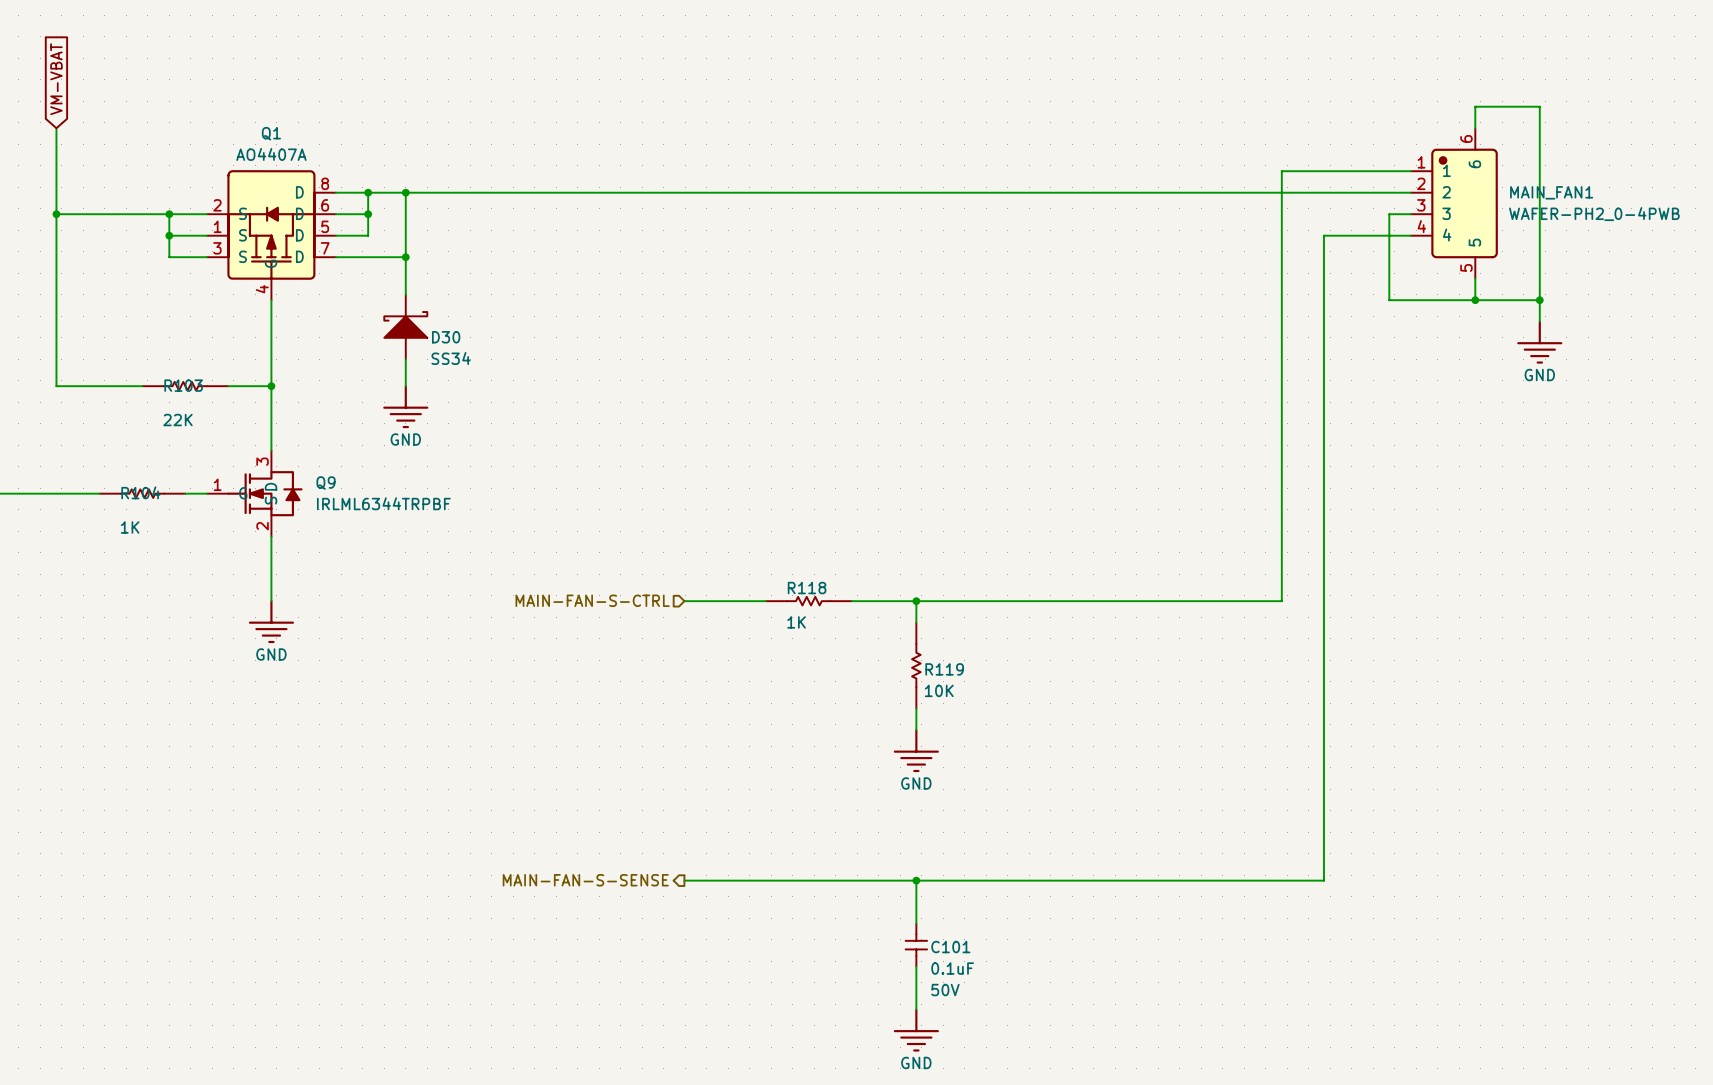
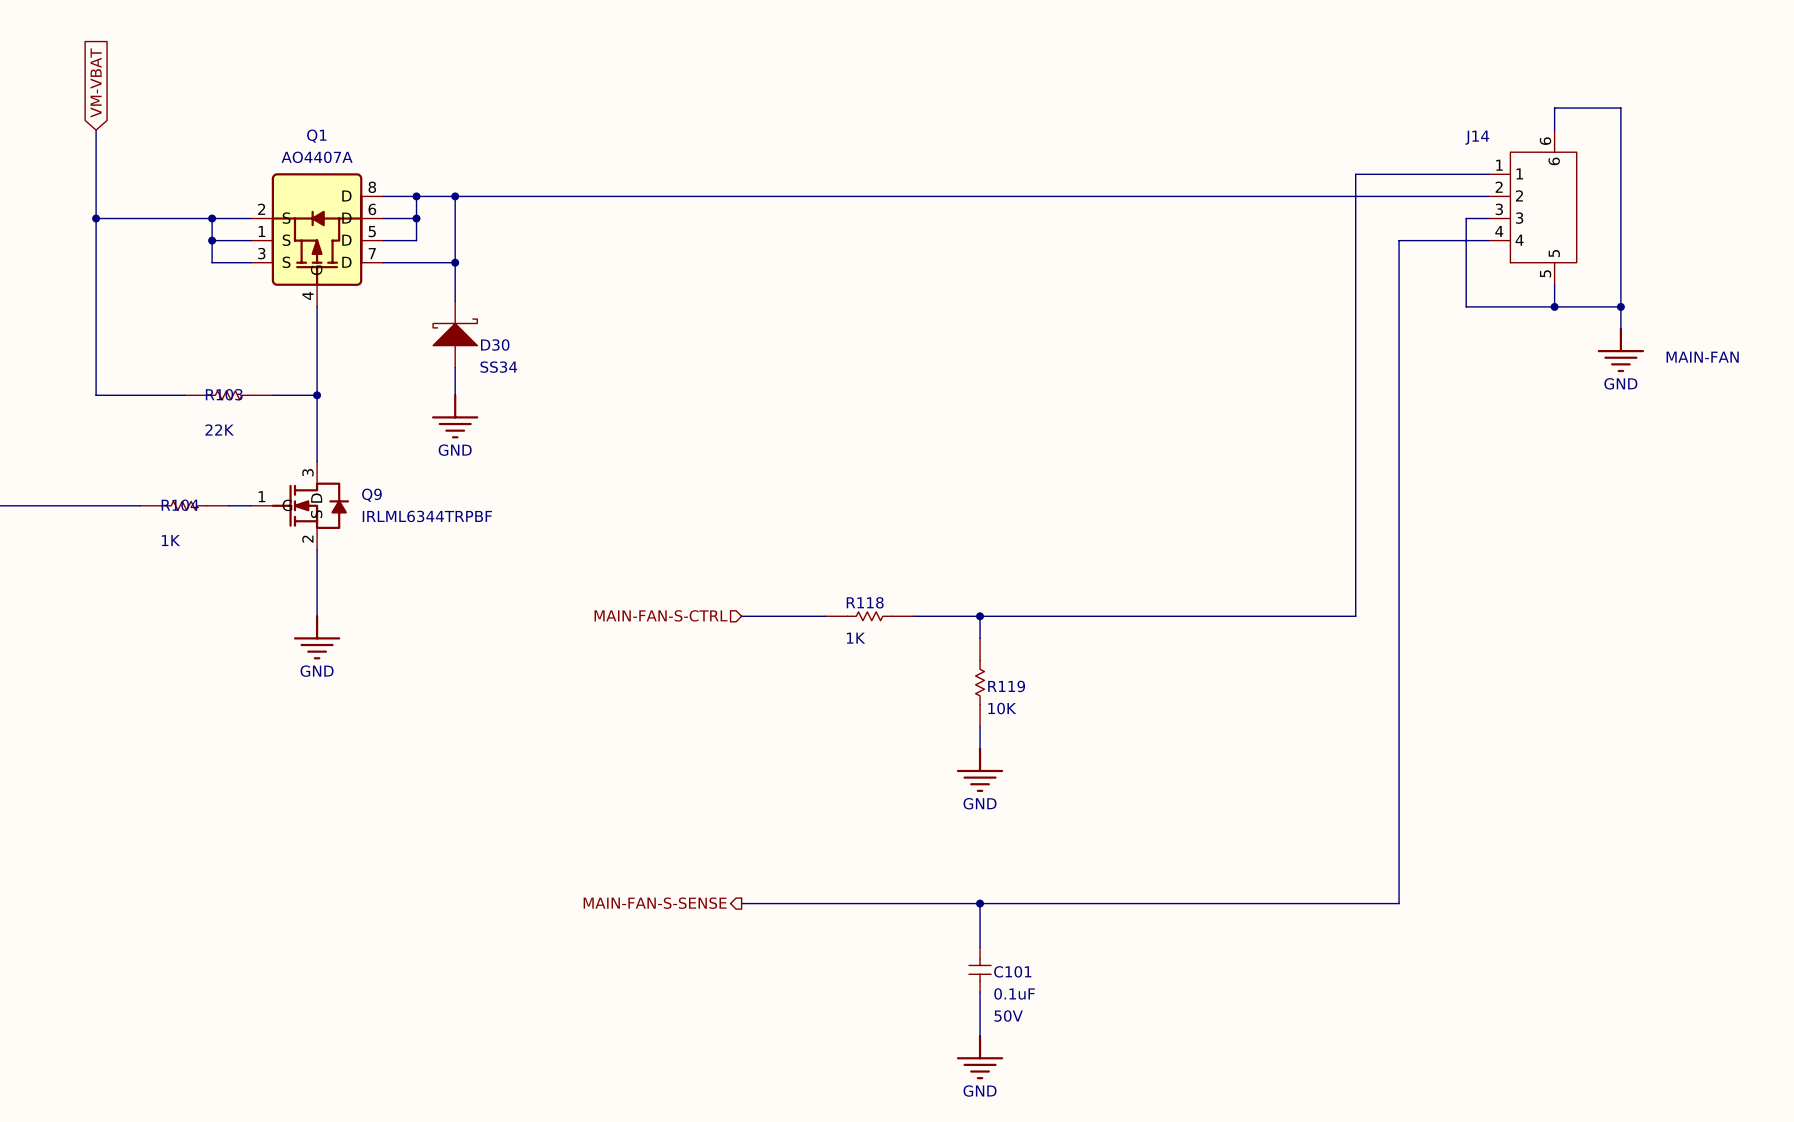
J14: none -> MAIN-FAN (1532, 207)
MAIN_FAN1: WAFER-PH2_0-4PWB (1454, 203) -> none

